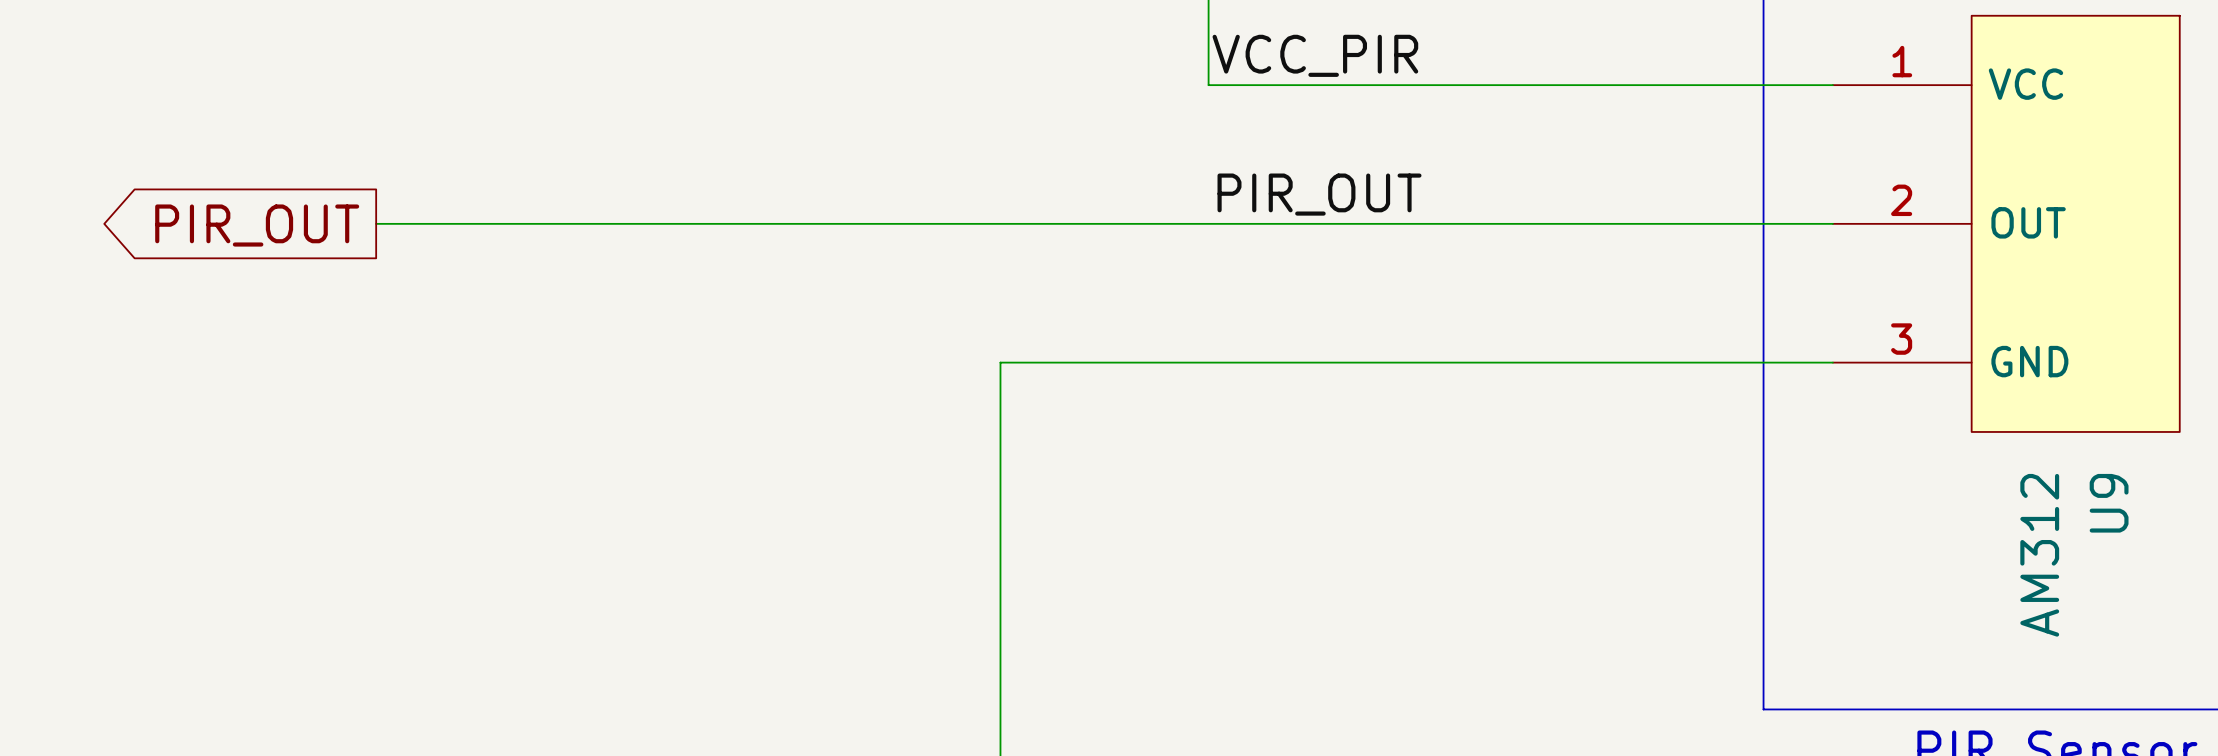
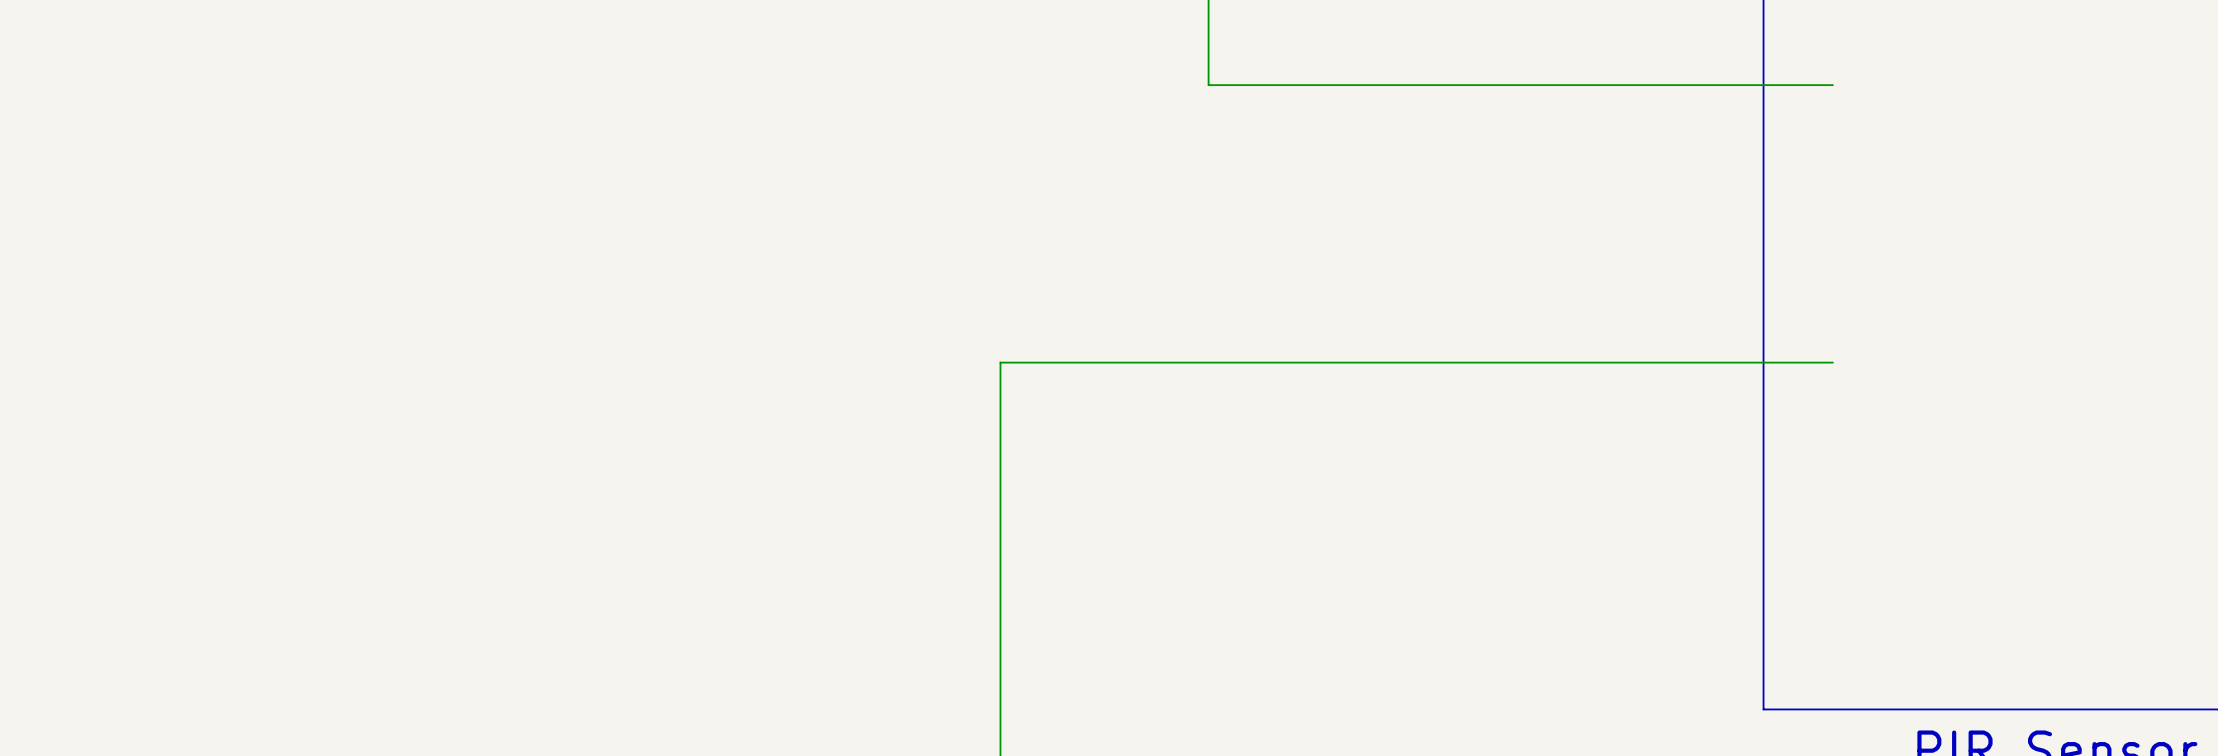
label: VCC_PIR (1315, 55) -> none
label: PIR_OUT (1319, 194) -> none
wire: (376, 223) (1832, 223) -> none
U9: AM312 (2006, 223) -> none
global label: PIR_OUT (257, 225) -> none

